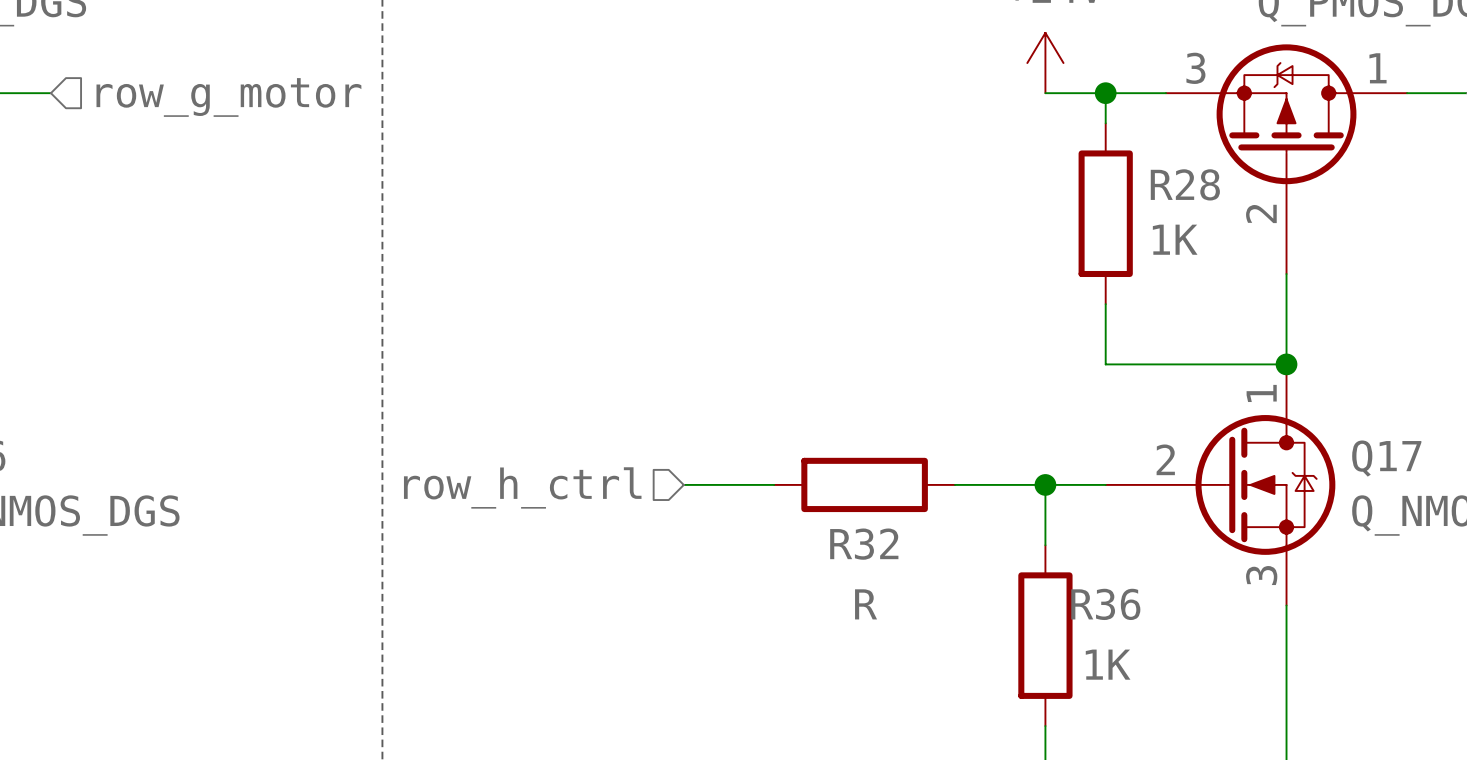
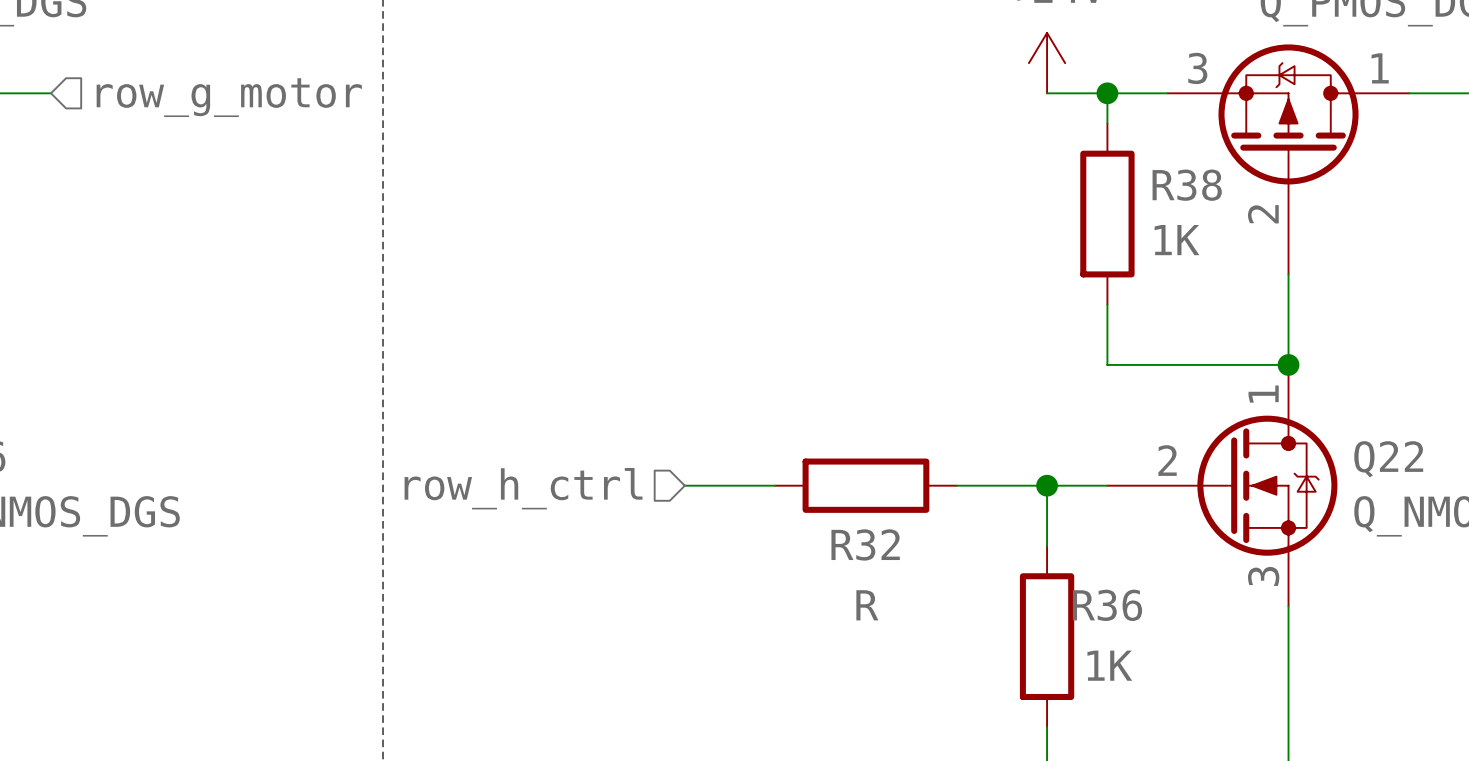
R28 name: R28 (1185, 184) -> R38 (1187, 185)
Q17 name: Q17 (1386, 458) -> Q22 (1388, 459)

